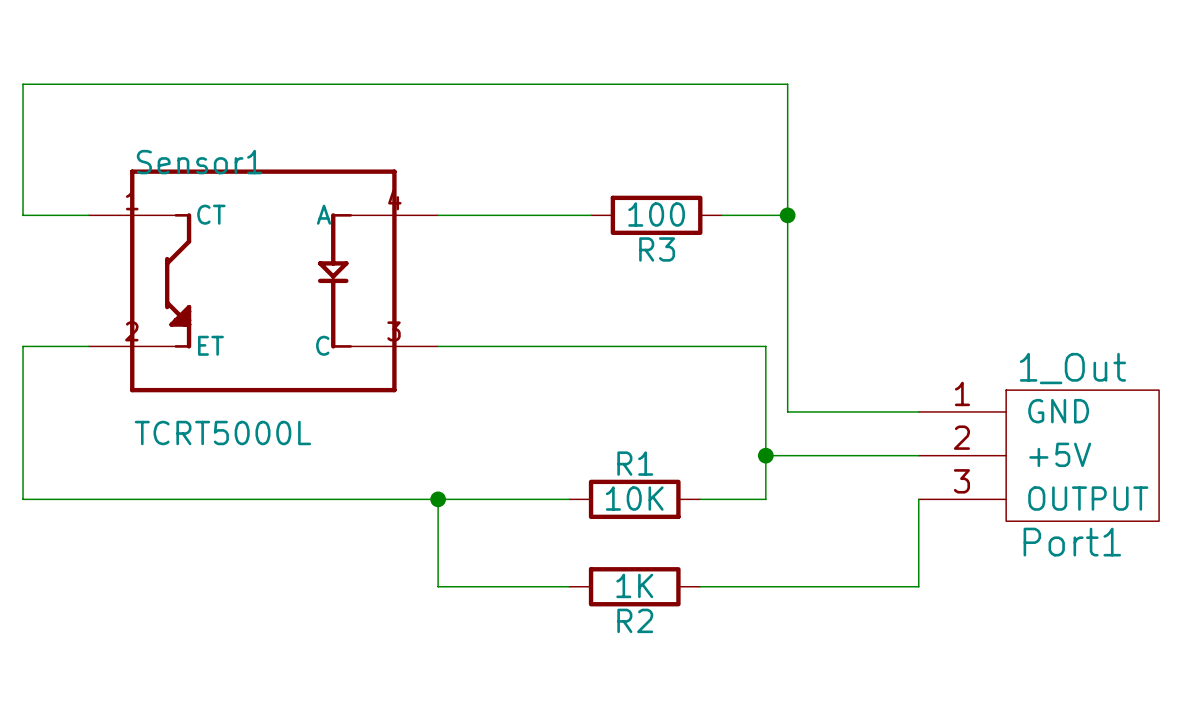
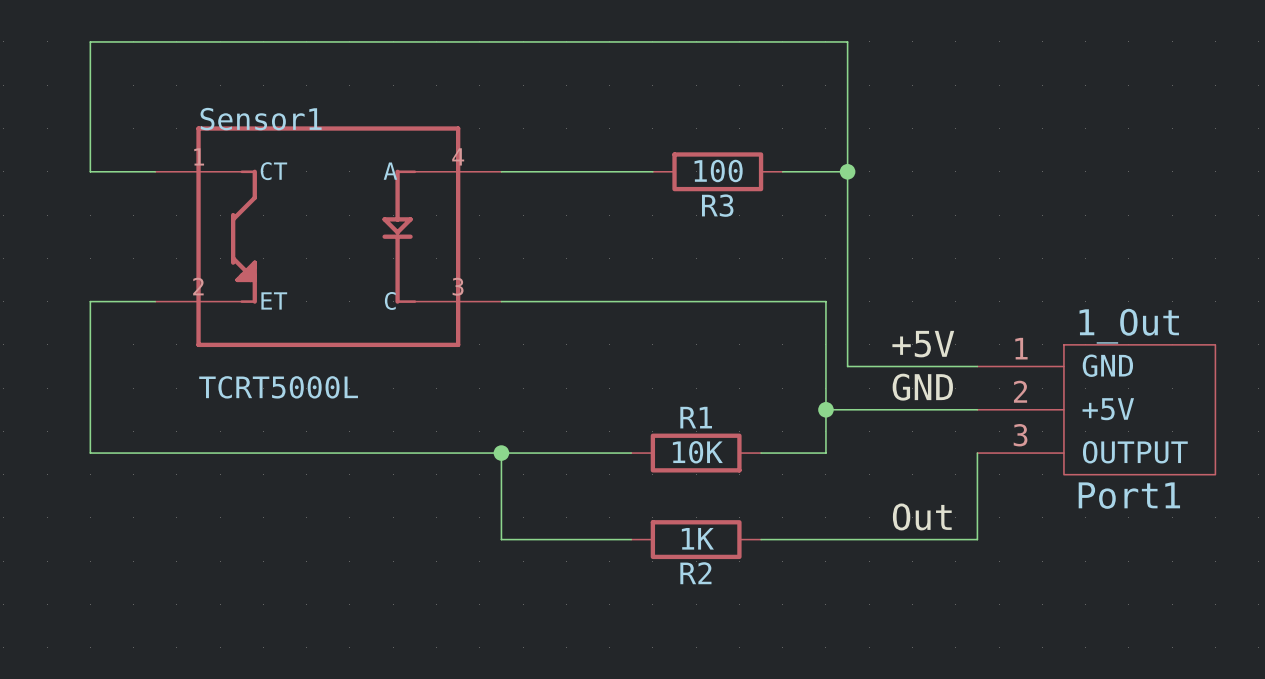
label: none -> +5V (923, 344)
label: none -> GND (922, 387)
label: none -> Out (922, 516)

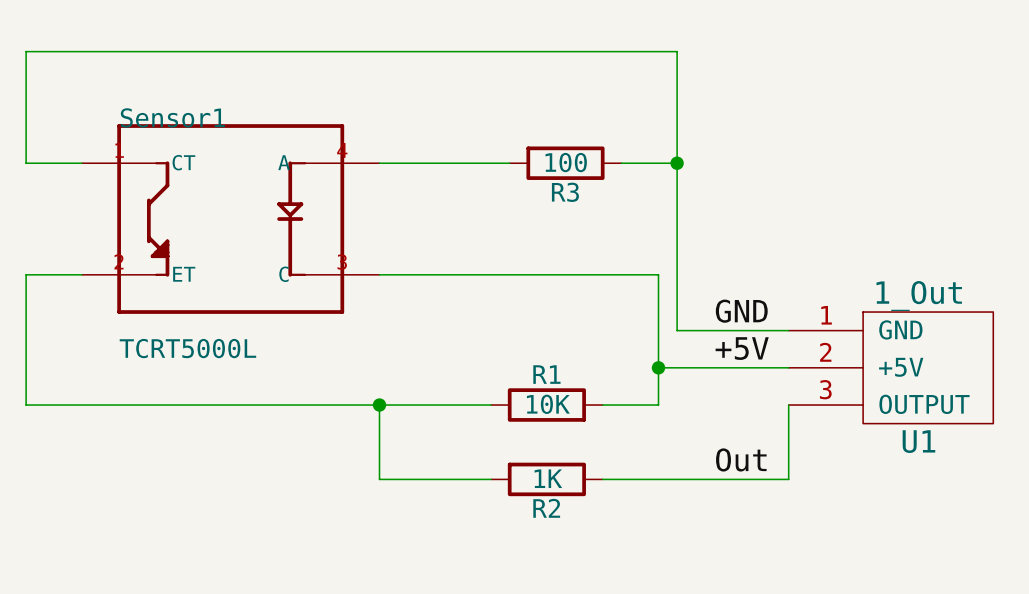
label: +5V (923, 344) -> GND (741, 311)
label: GND (922, 387) -> +5V (742, 348)
Port1 name: Port1 (1129, 495) -> U1 (918, 441)

